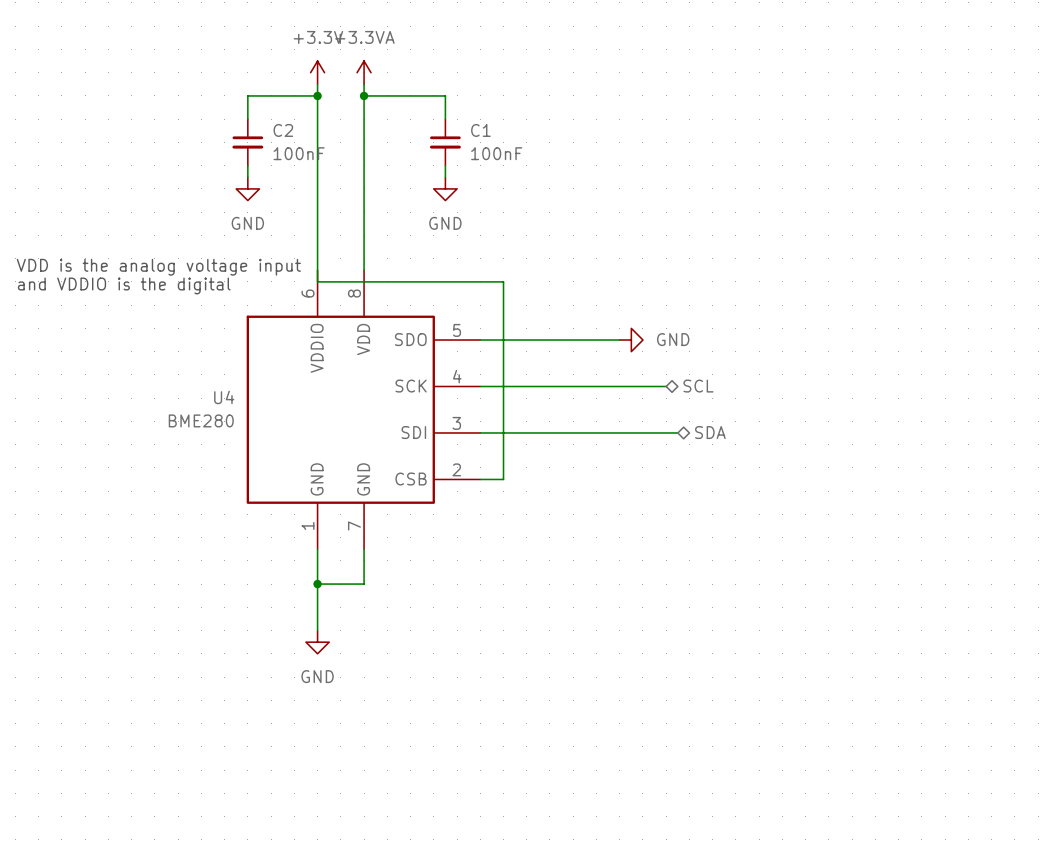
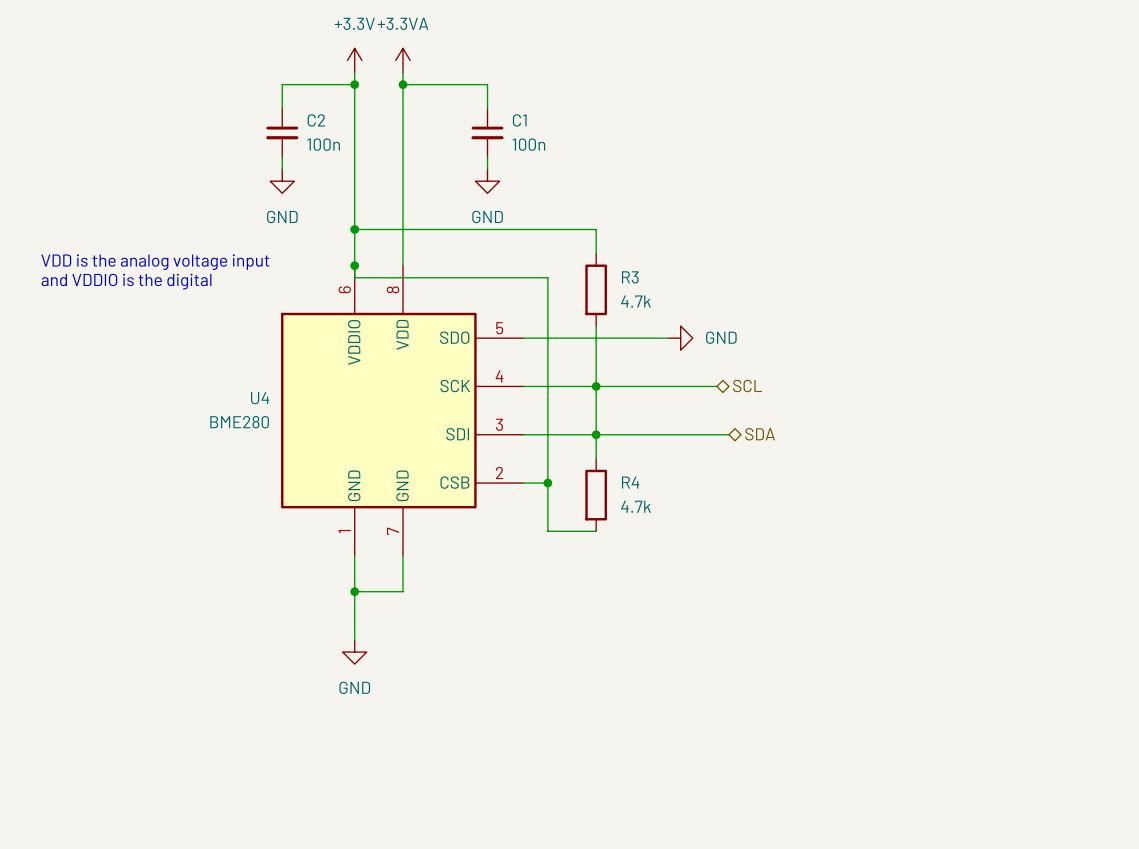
C2 value: 100nF (299, 153) -> 100n (323, 144)
C1 value: 100nF (496, 153) -> 100n (528, 144)
wire: none -> (354, 229) (596, 229) (596, 253)
junction: none -> (354, 229)
junction: none -> (354, 265)
R3: none -> 4.7k (596, 289)
wire: none -> (596, 326) (596, 458)
junction: none -> (596, 386)
junction: none -> (596, 434)
wire: none -> (547, 483) (547, 531) (596, 531)
junction: none -> (547, 483)
R4: none -> 4.7k (596, 495)

